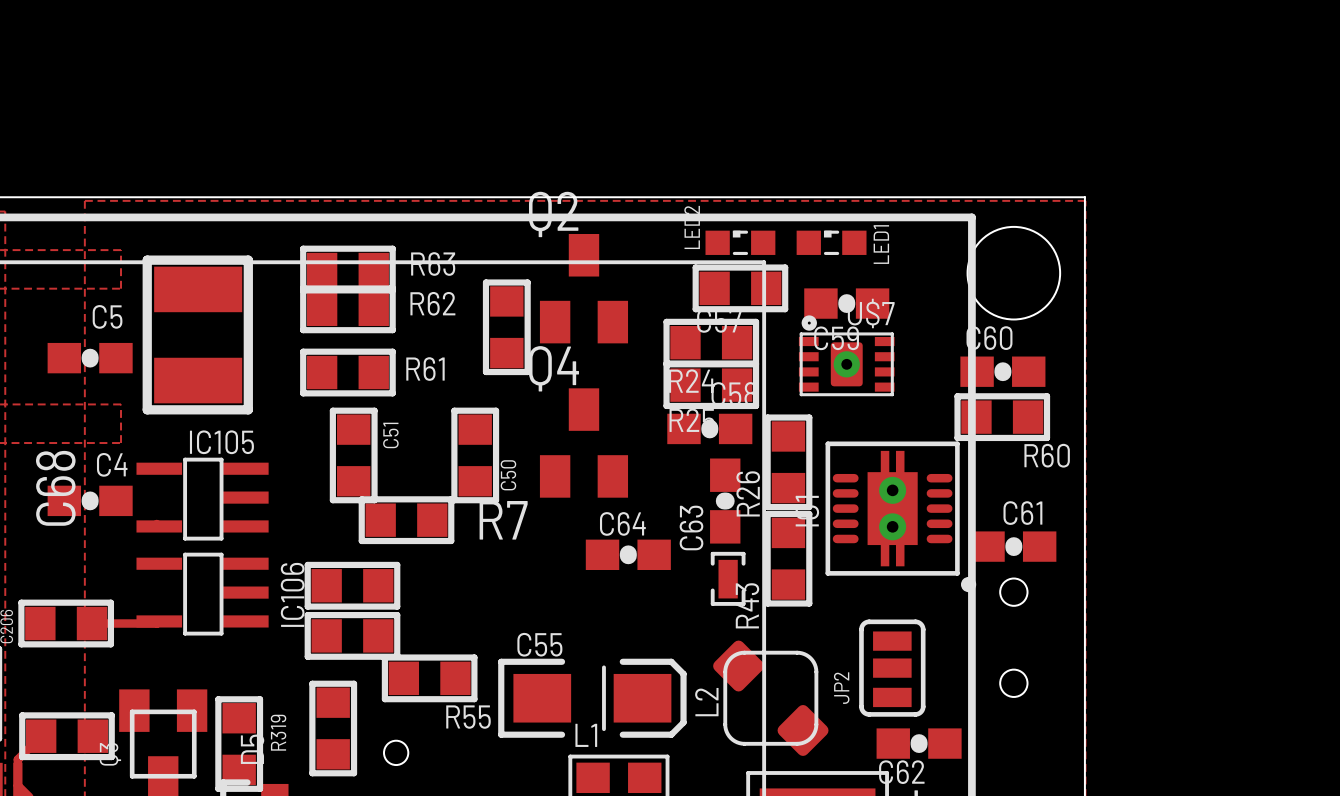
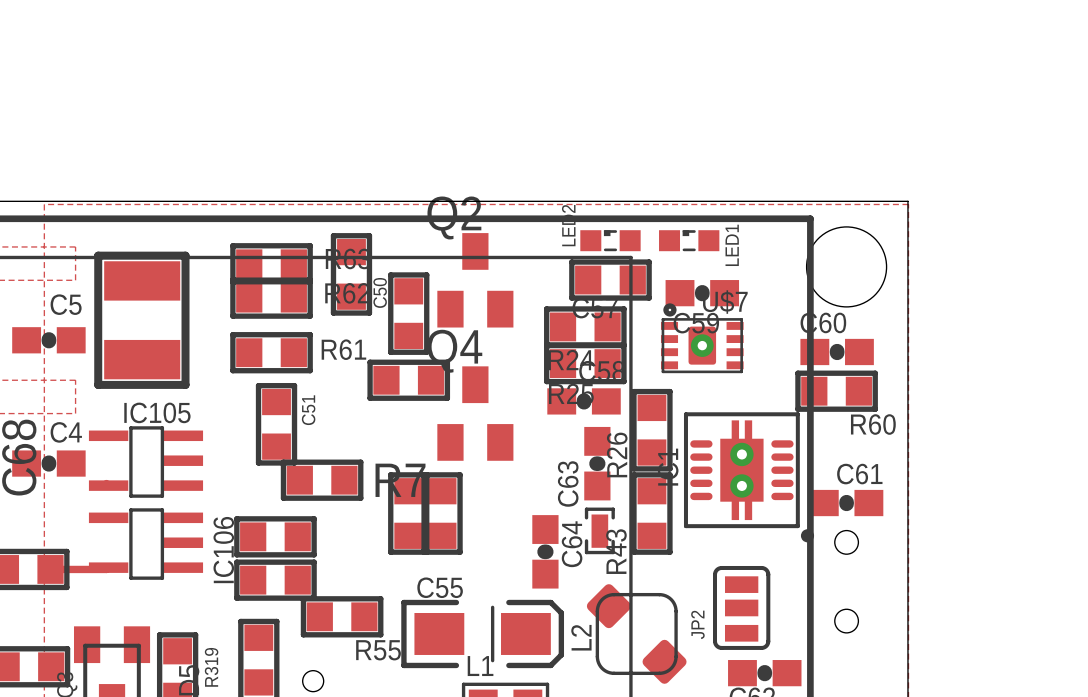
part: none -> (408, 380)
C50 position: (475, 455) -> (351, 274)
C64 rotation: 0° (628, 554) -> 90° clockwise (545, 551)
C64 position: (628, 554) -> (545, 551)
part: none -> (408, 513)
part: none -> (442, 513)

